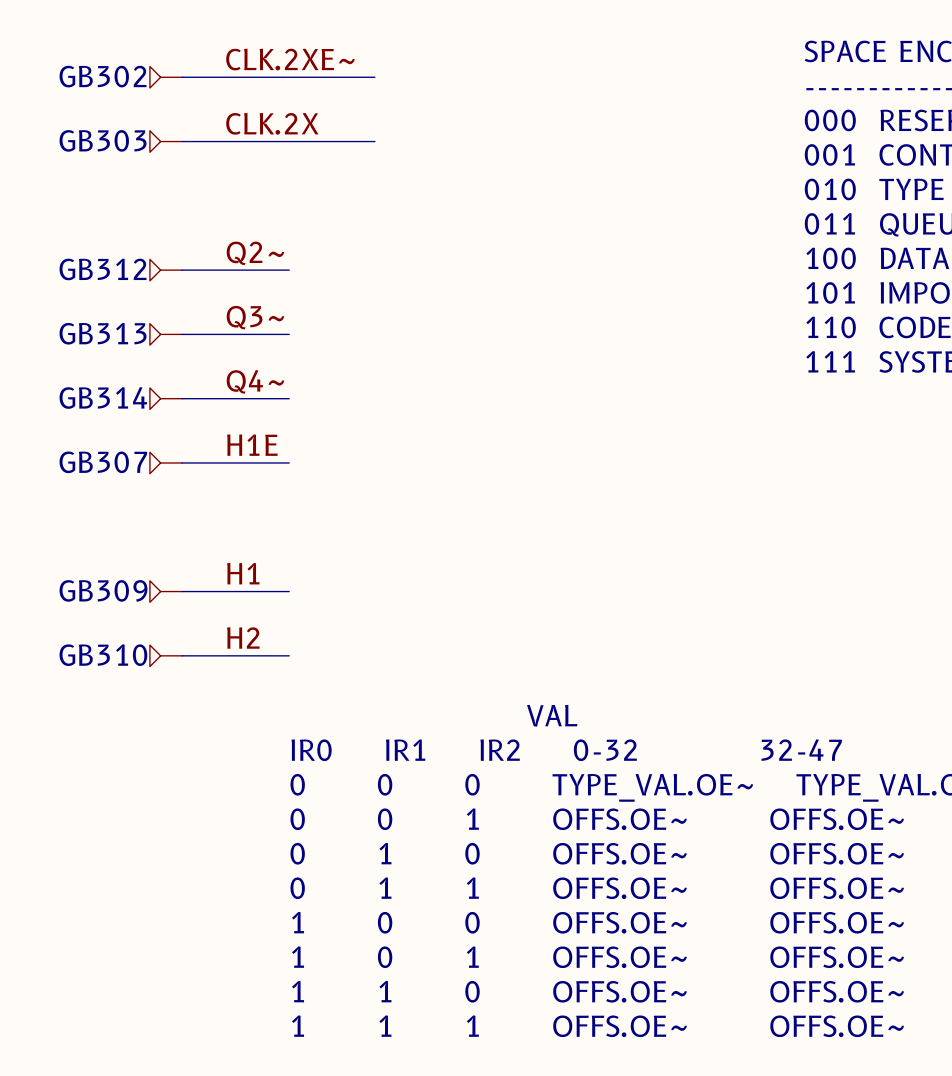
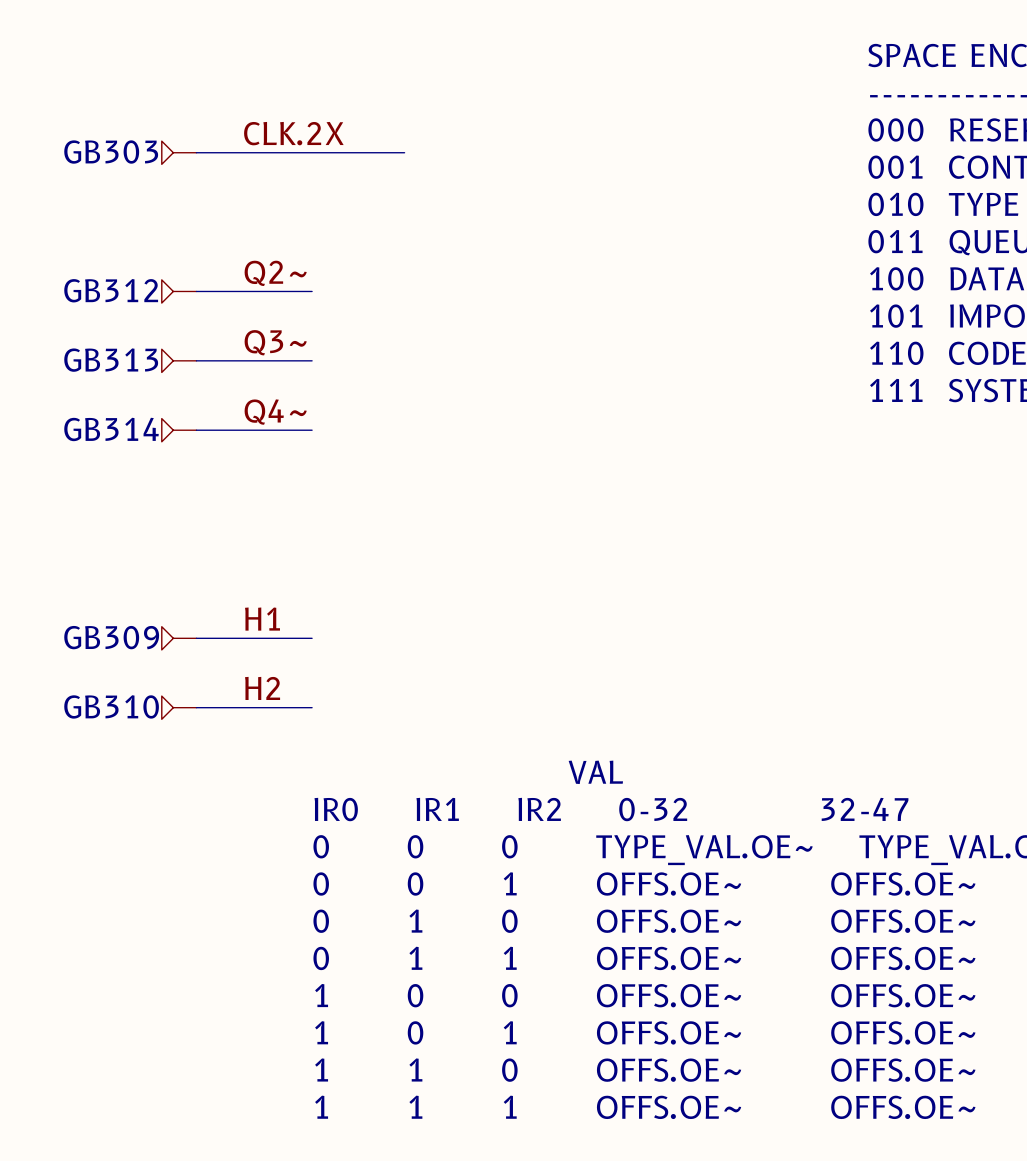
label: CLK.2XE~ (290, 59) -> none
GB302: (165, 77) -> none
wire: (182, 77) (374, 77) -> none
label: H1E (252, 445) -> none
GB307: (165, 462) -> none
wire: (182, 462) (289, 462) -> none

